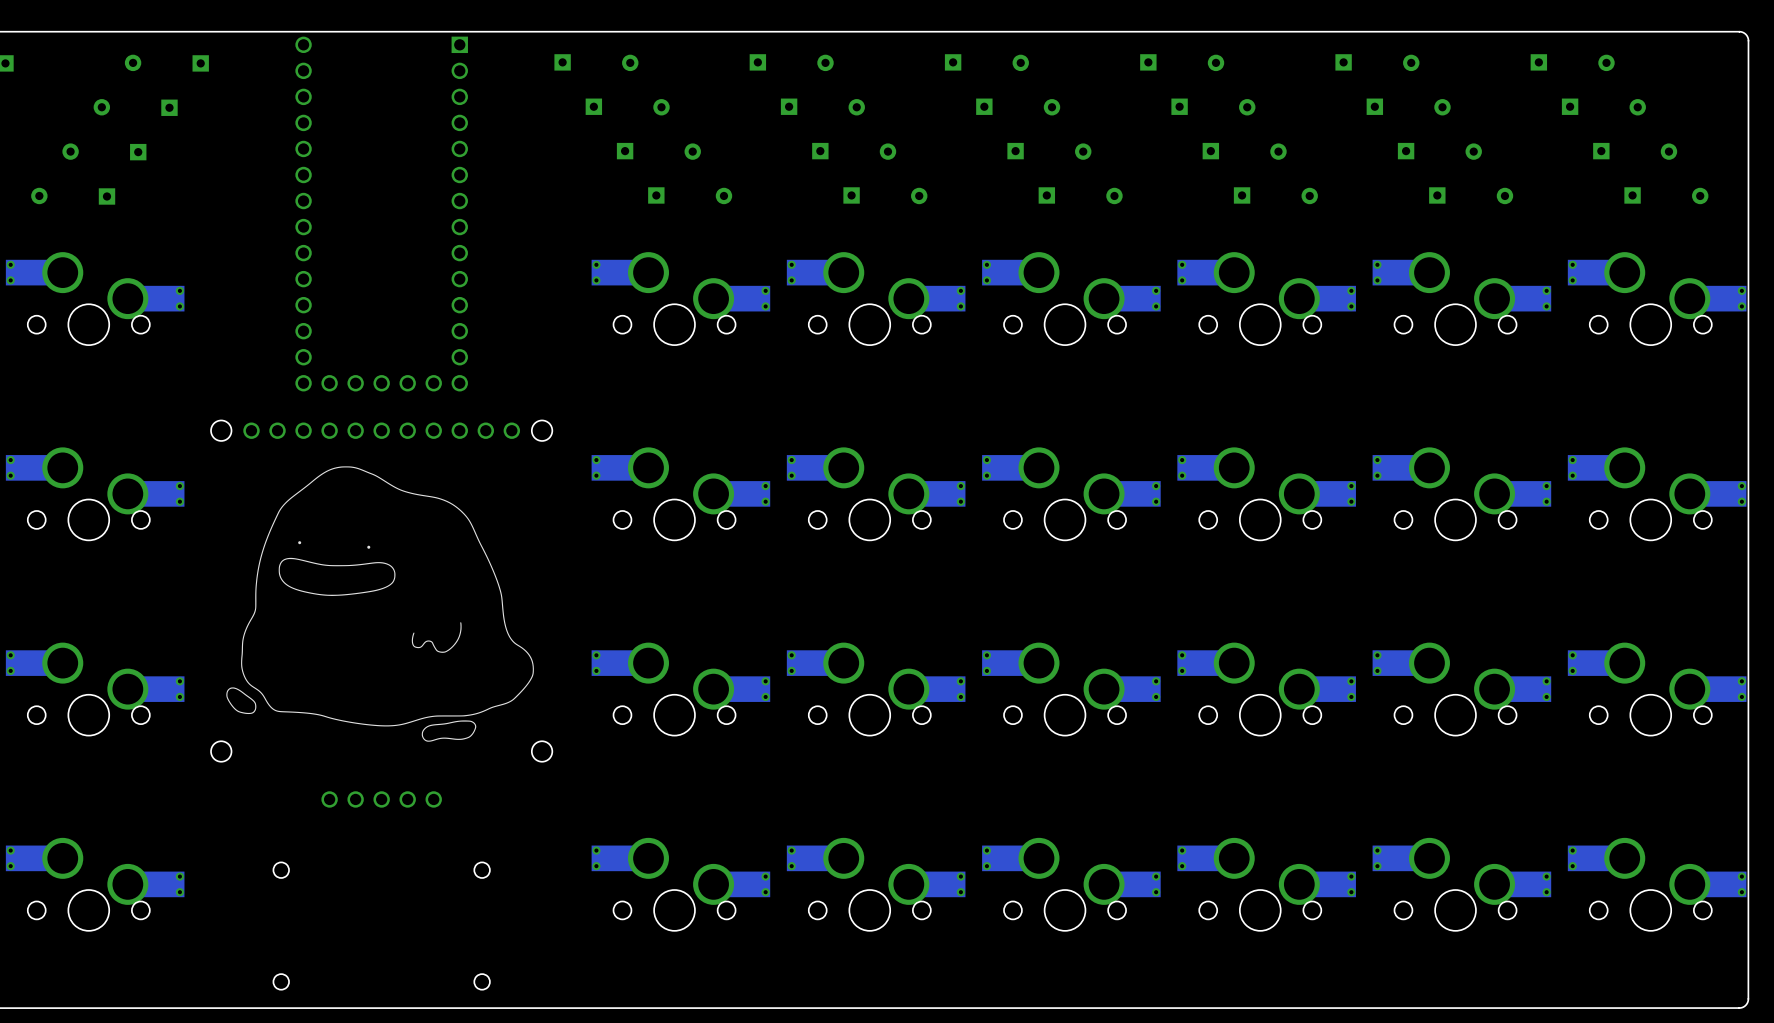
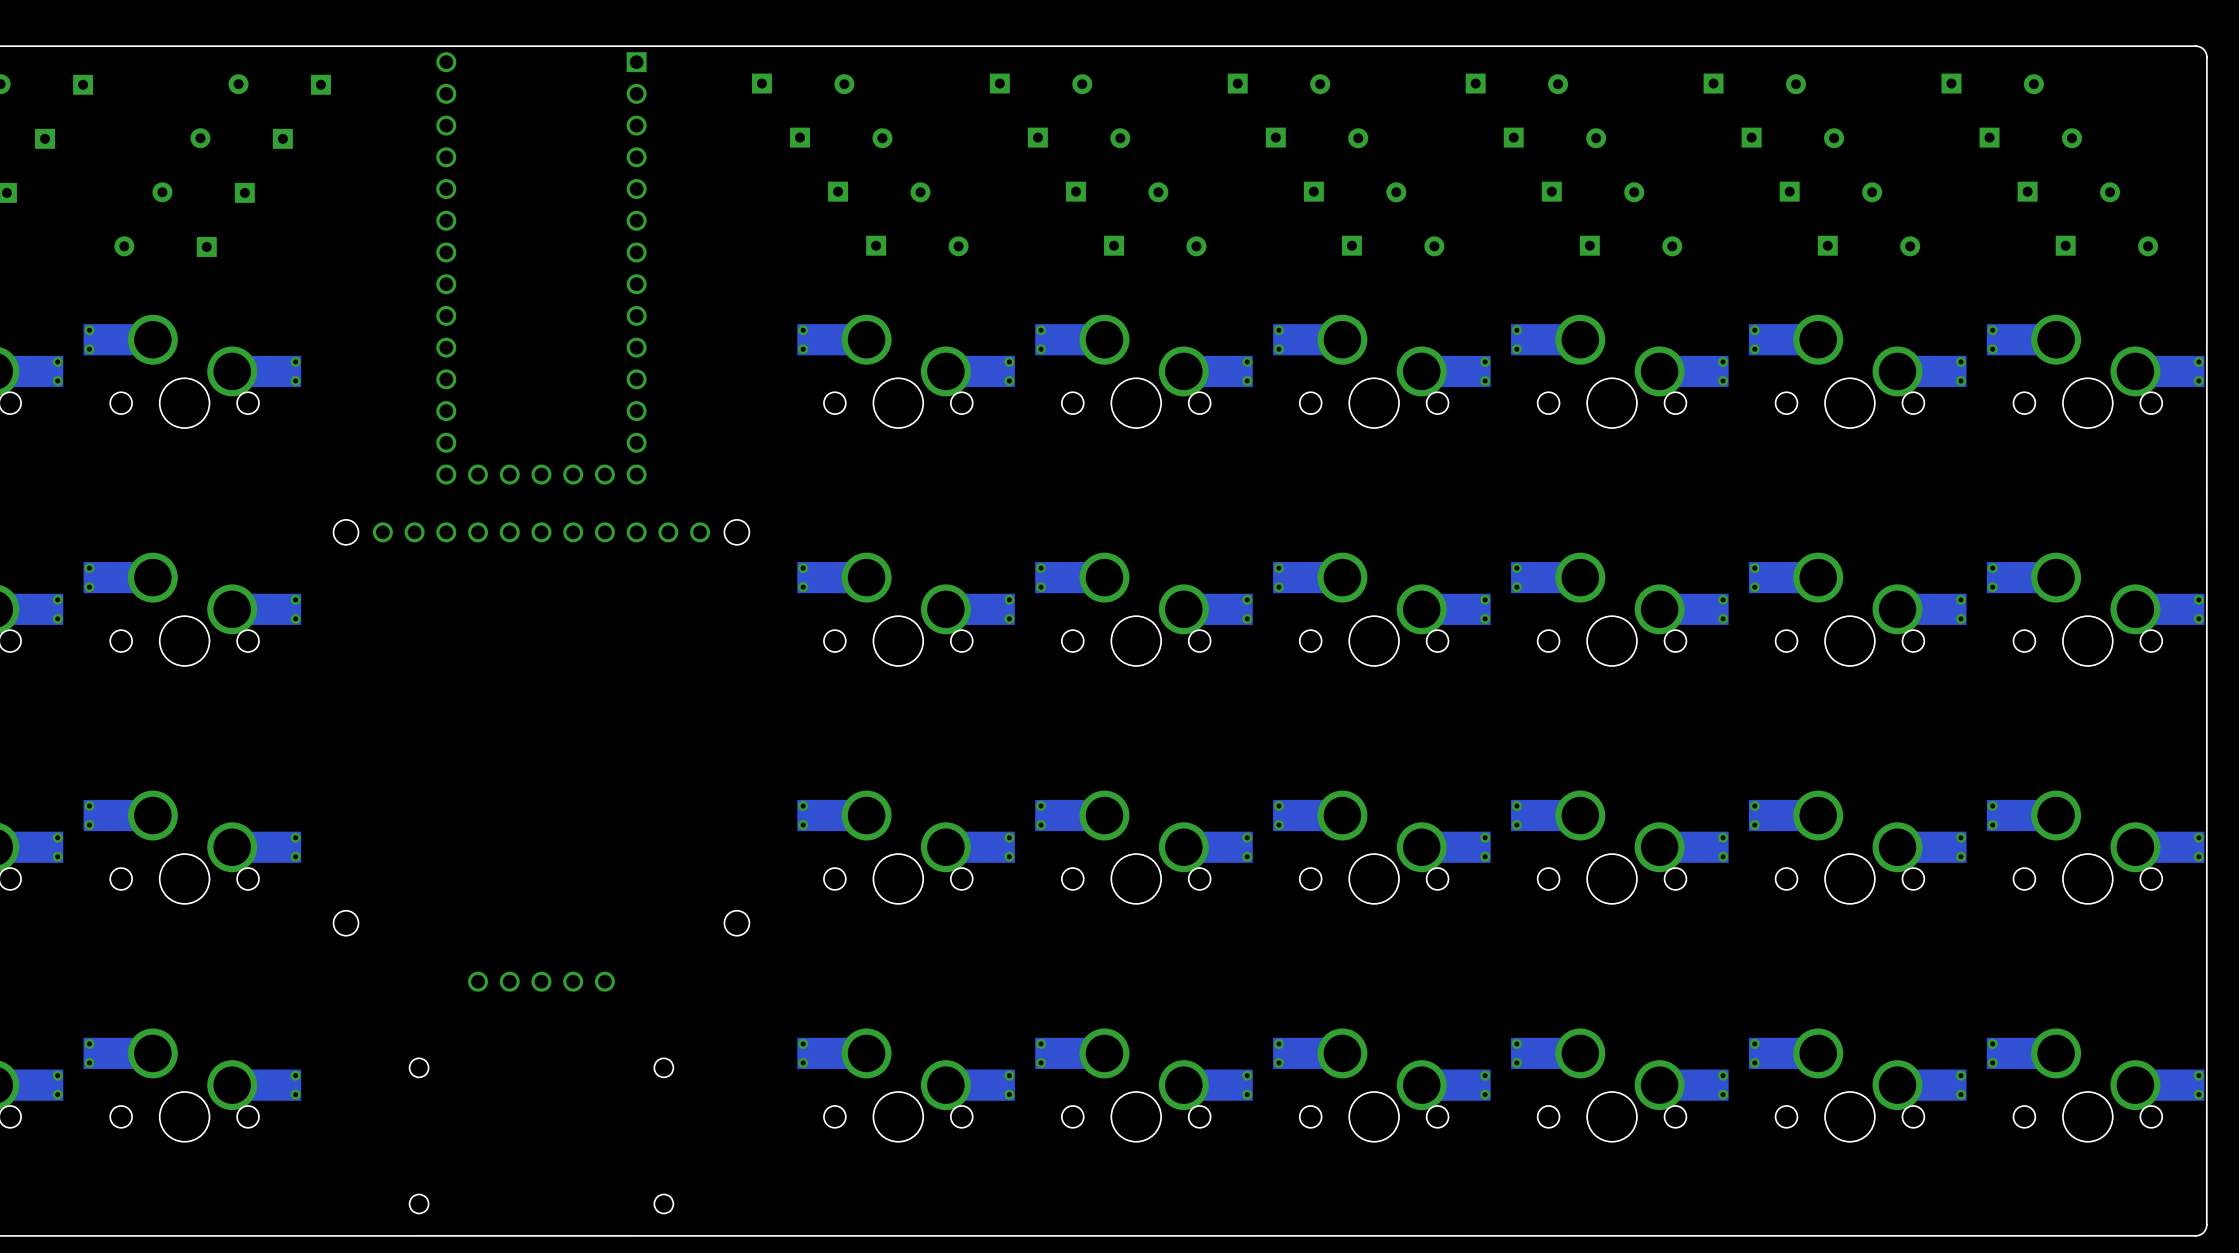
drawing: [226, 466, 534, 742] -> none

